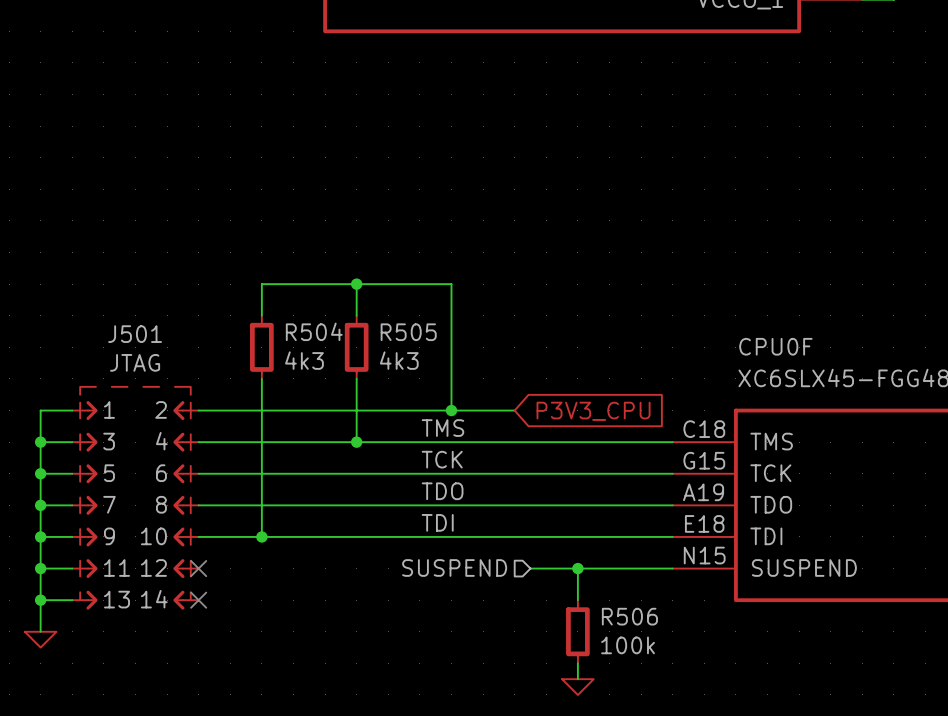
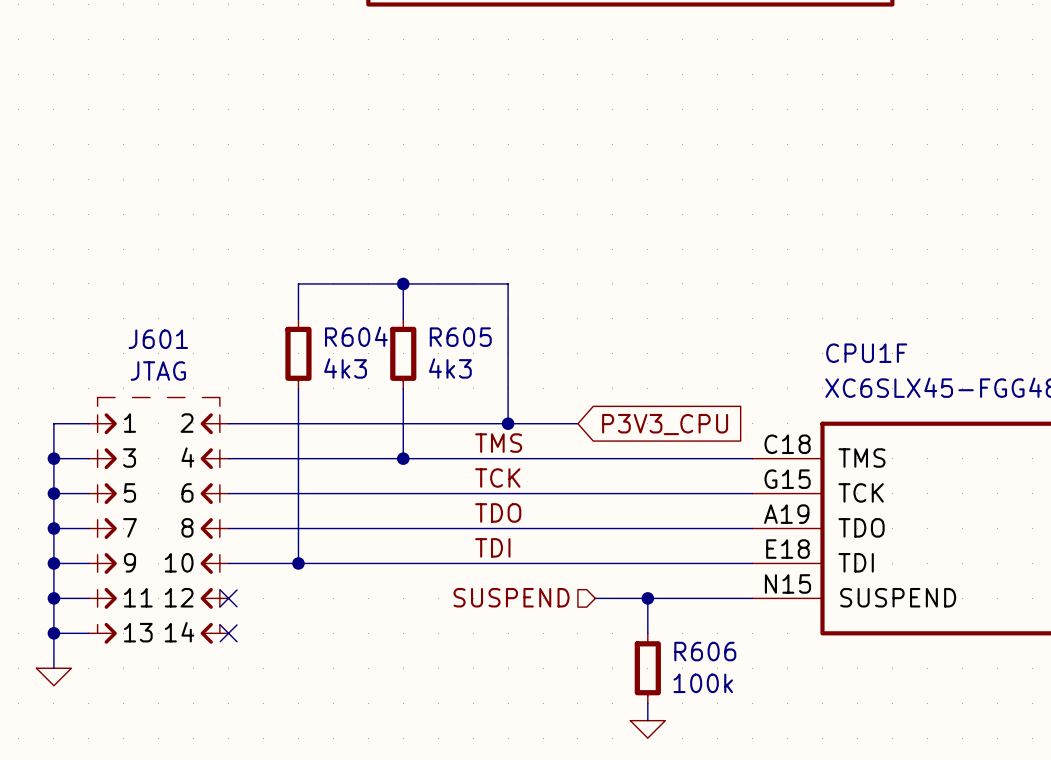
R504 name: R504 (314, 331) -> R604 (356, 336)
R505 name: R505 (408, 332) -> R605 (460, 337)
J501 name: J501 (135, 334) -> J601 (158, 339)
CPU0F name: CPU0F (775, 346) -> CPU1F (866, 353)
R506 name: R506 (629, 616) -> R606 (705, 651)

